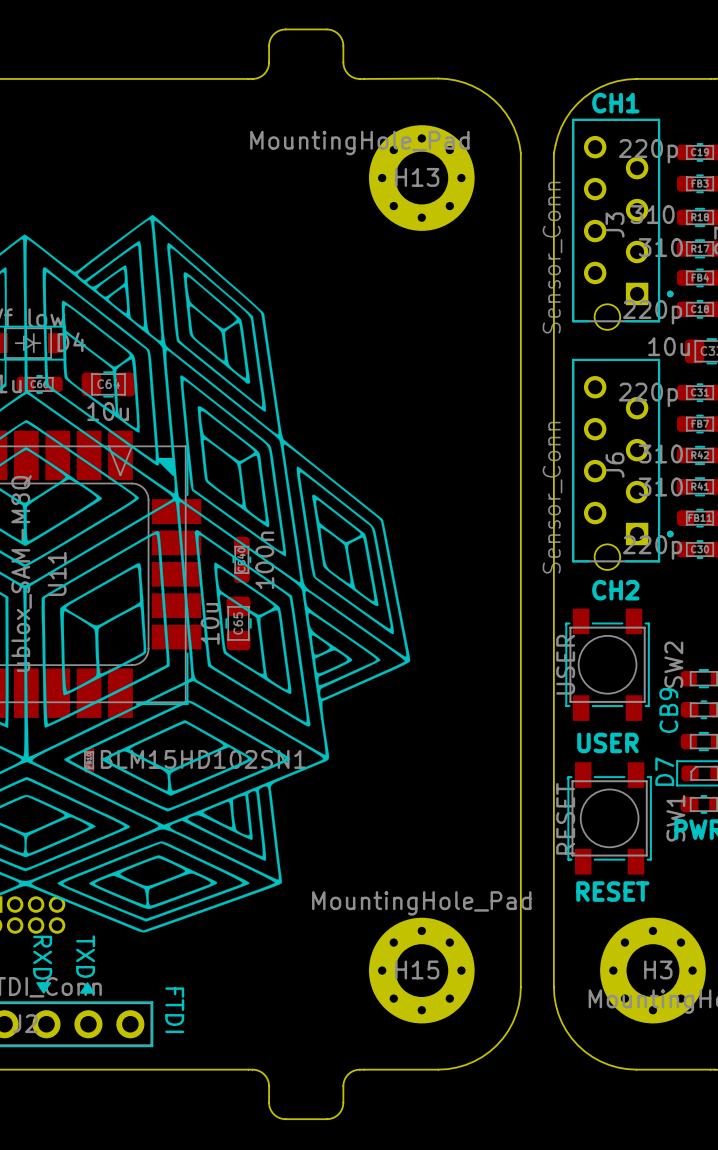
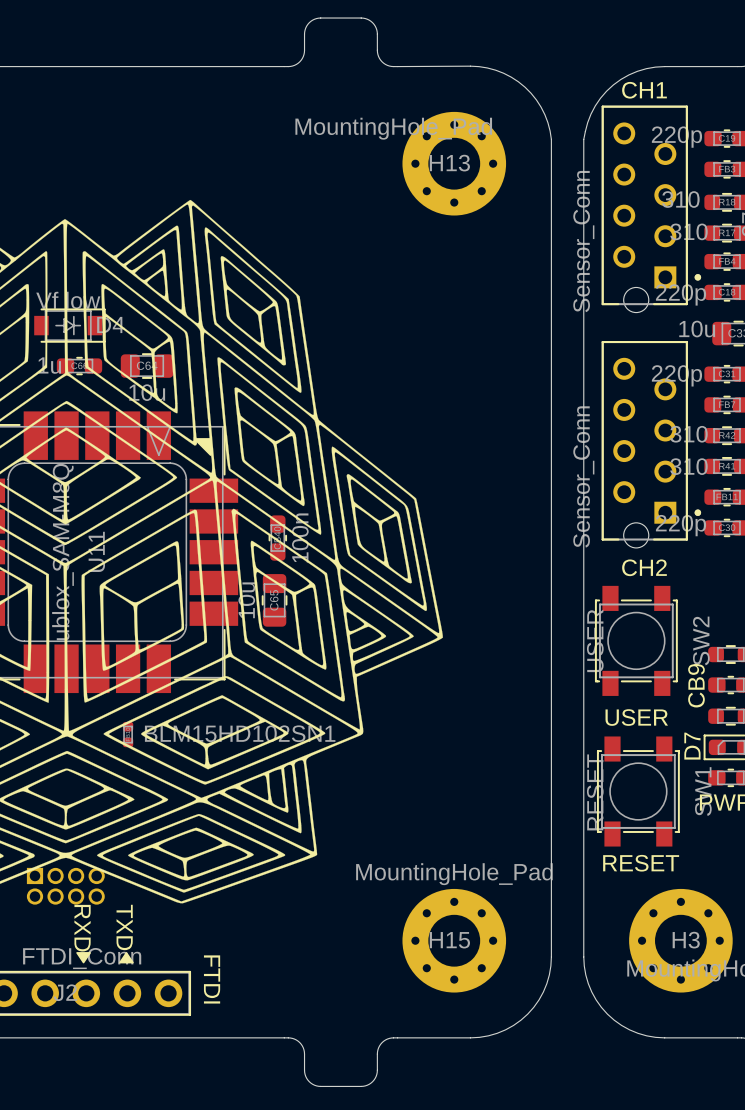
J3 name: J3 (615, 224) -> none
J6 name: J6 (615, 465) -> none

